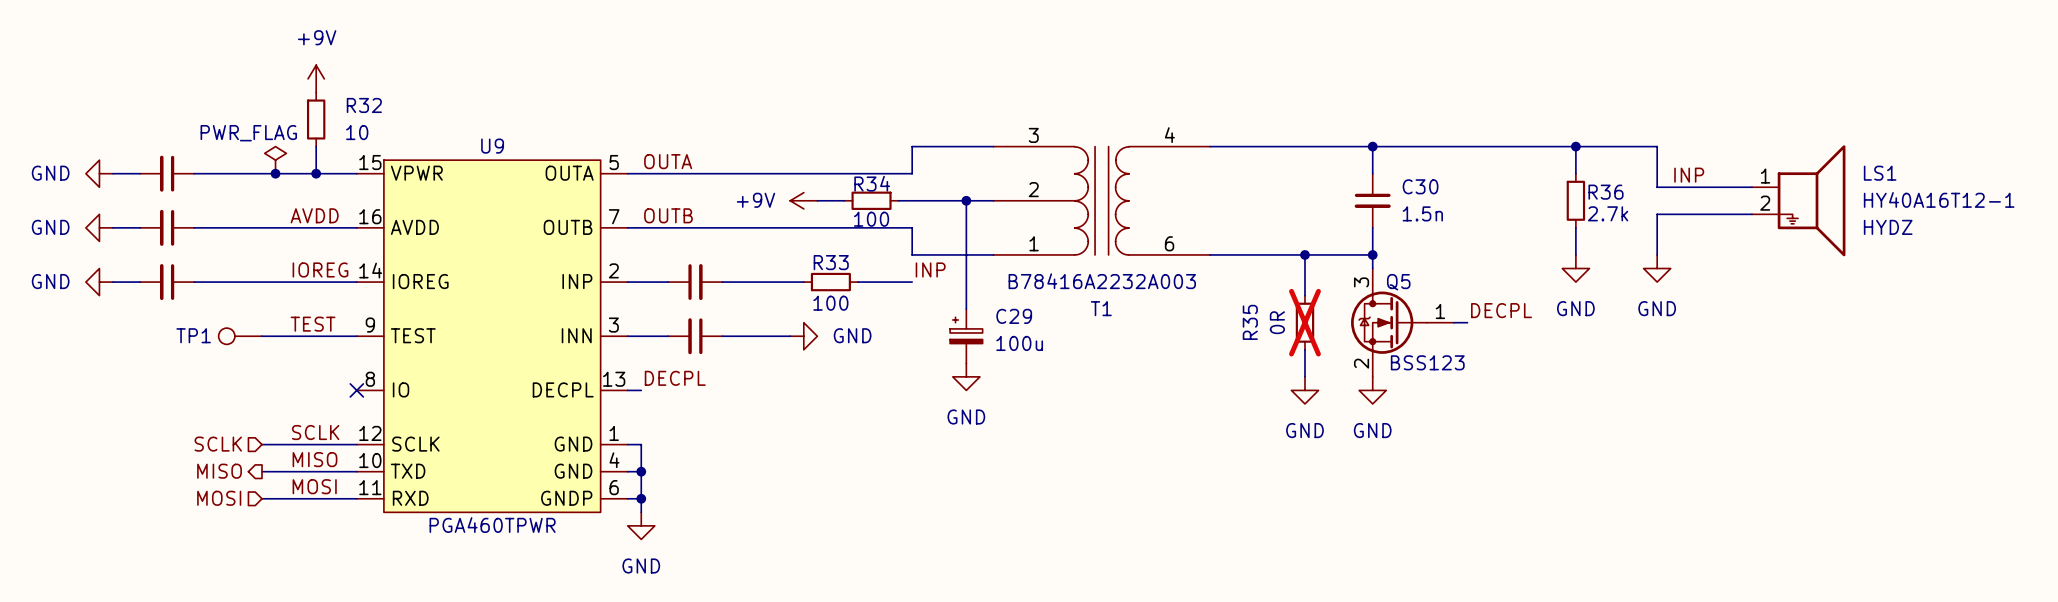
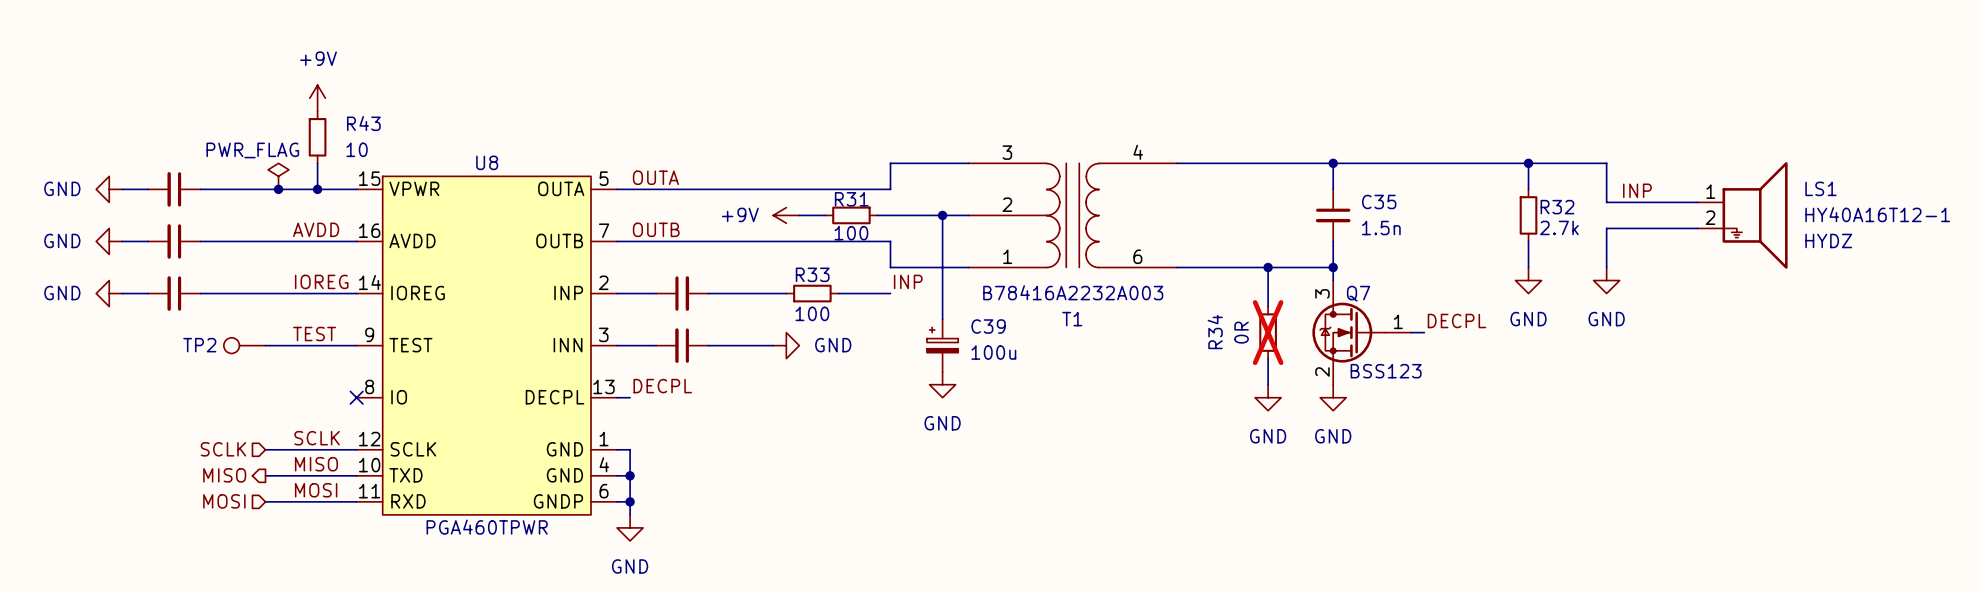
R32 name: R32 (364, 105) -> R43 (363, 123)
U9 name: U9 (492, 146) -> U8 (487, 162)
R34 name: R34 (872, 183) -> R31 (851, 199)
C30 name: C30 (1420, 186) -> C35 (1379, 201)
R36 name: R36 (1606, 192) -> R32 (1557, 207)
Q5 name: Q5 (1398, 282) -> Q7 (1358, 293)
C29 name: C29 (1014, 316) -> C39 (988, 326)
R35 name: R35 (1250, 322) -> R34 (1215, 331)
TP1 name: TP1 (193, 335) -> TP2 (199, 345)

